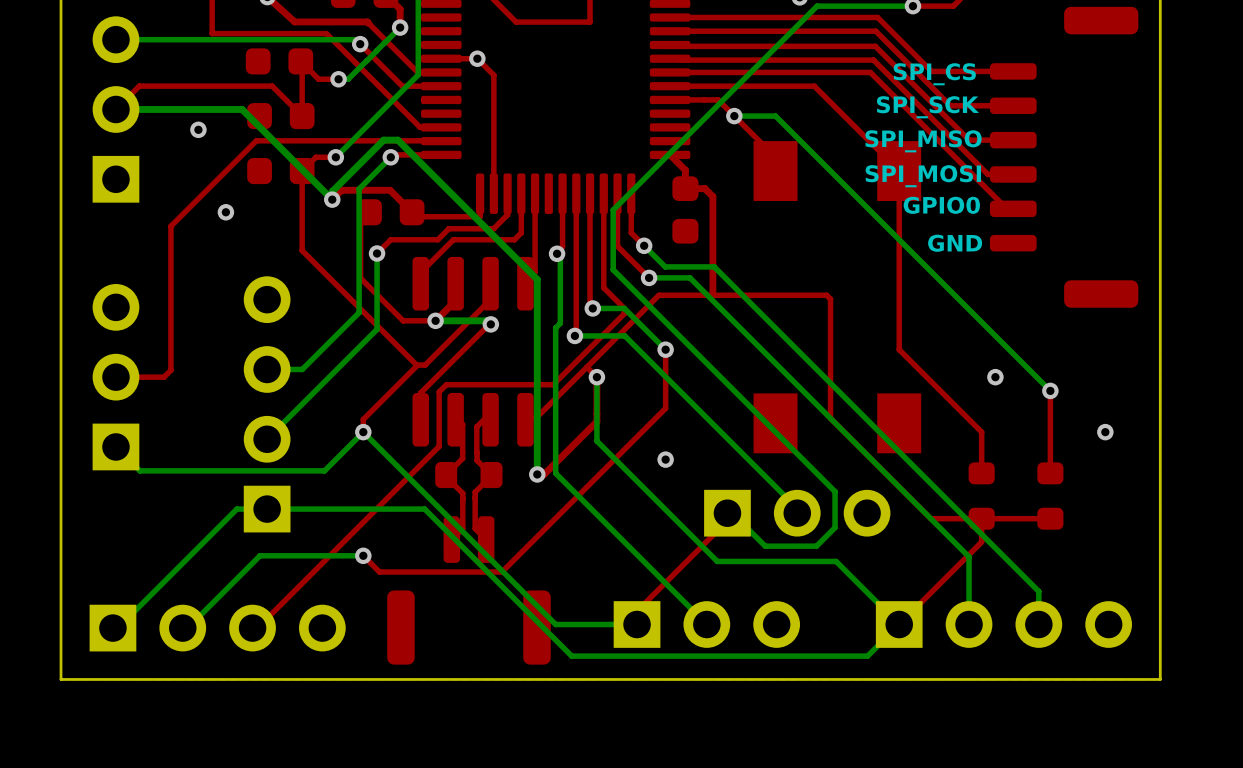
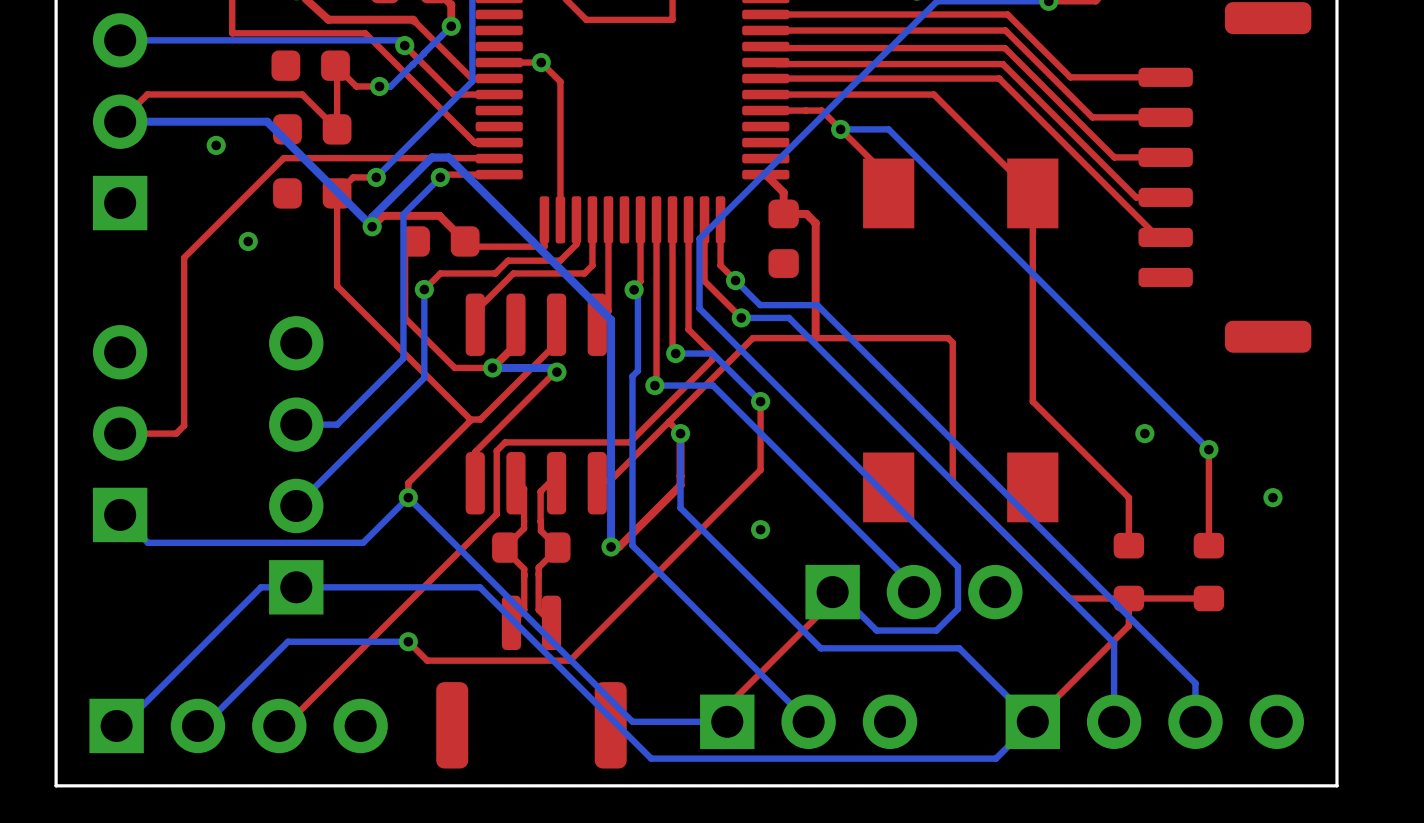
text: SPI_CS (934, 74) -> none
text: SPI_SCK (927, 107) -> none
text: SPI_MISO (923, 141) -> none
text: SPI_MOSI (923, 176) -> none
text: GPIO0 (941, 205) -> none
text: GND (955, 243) -> none

